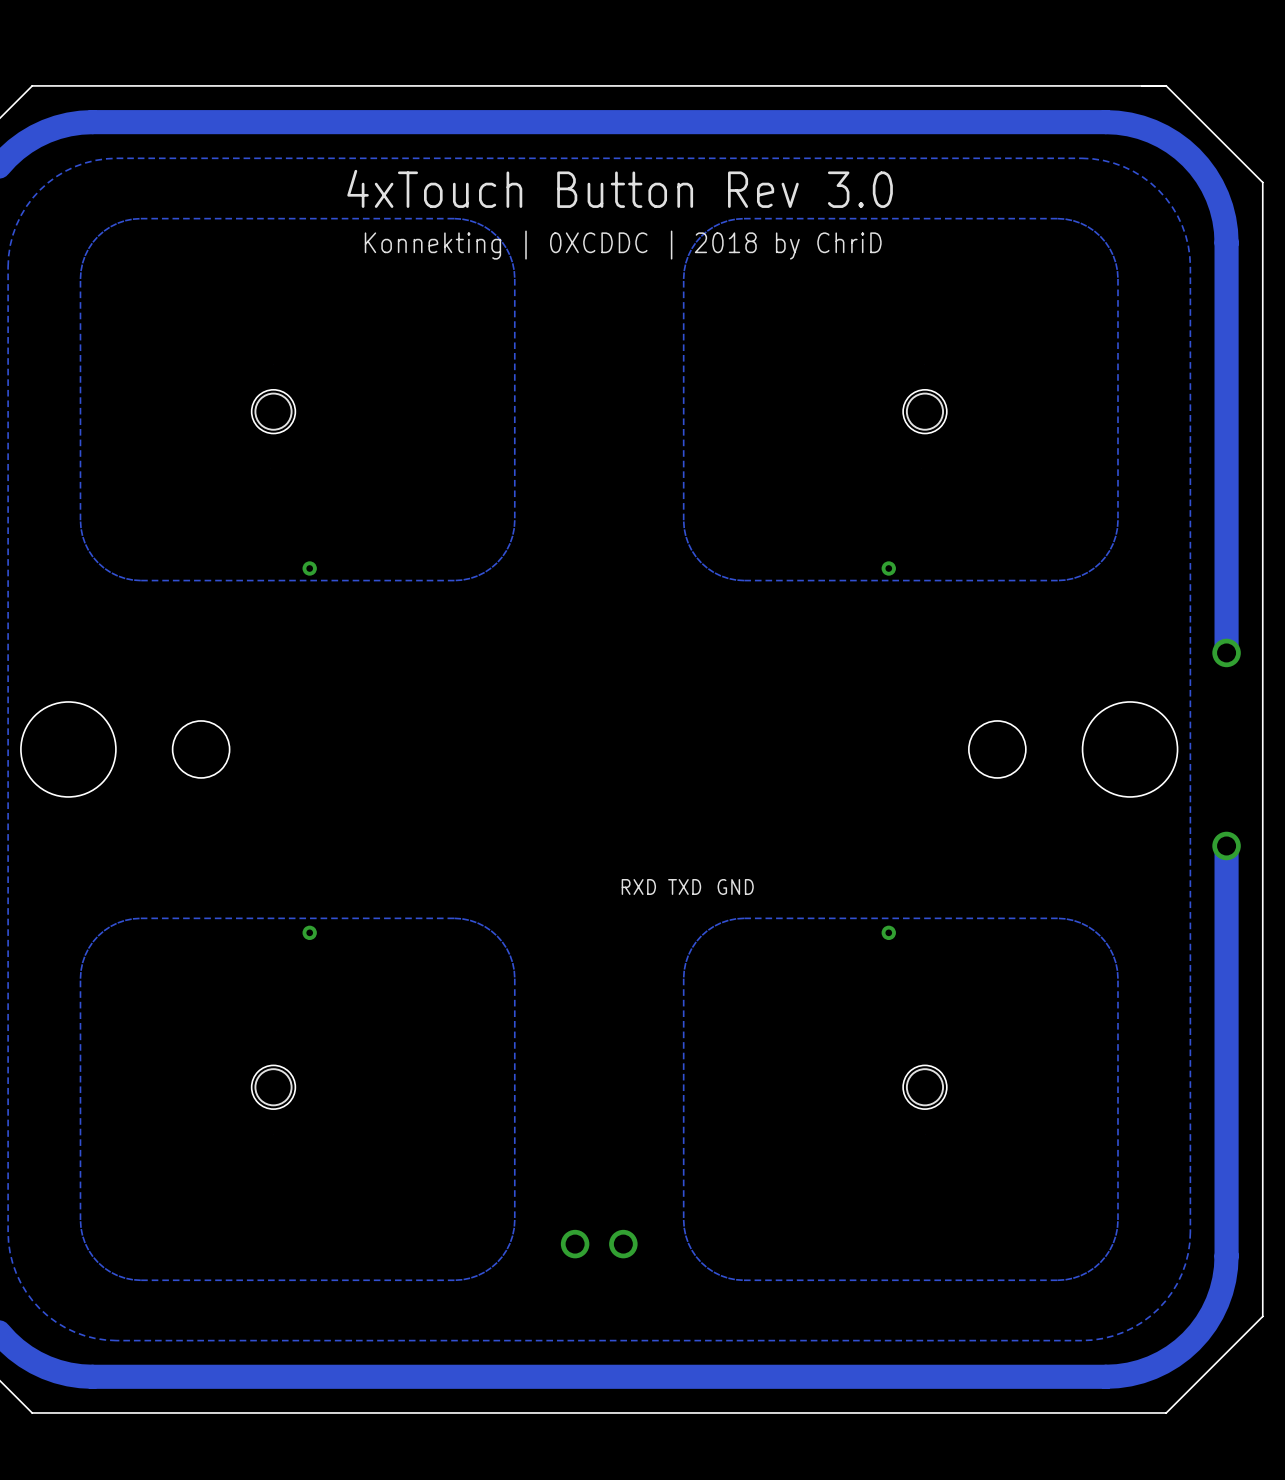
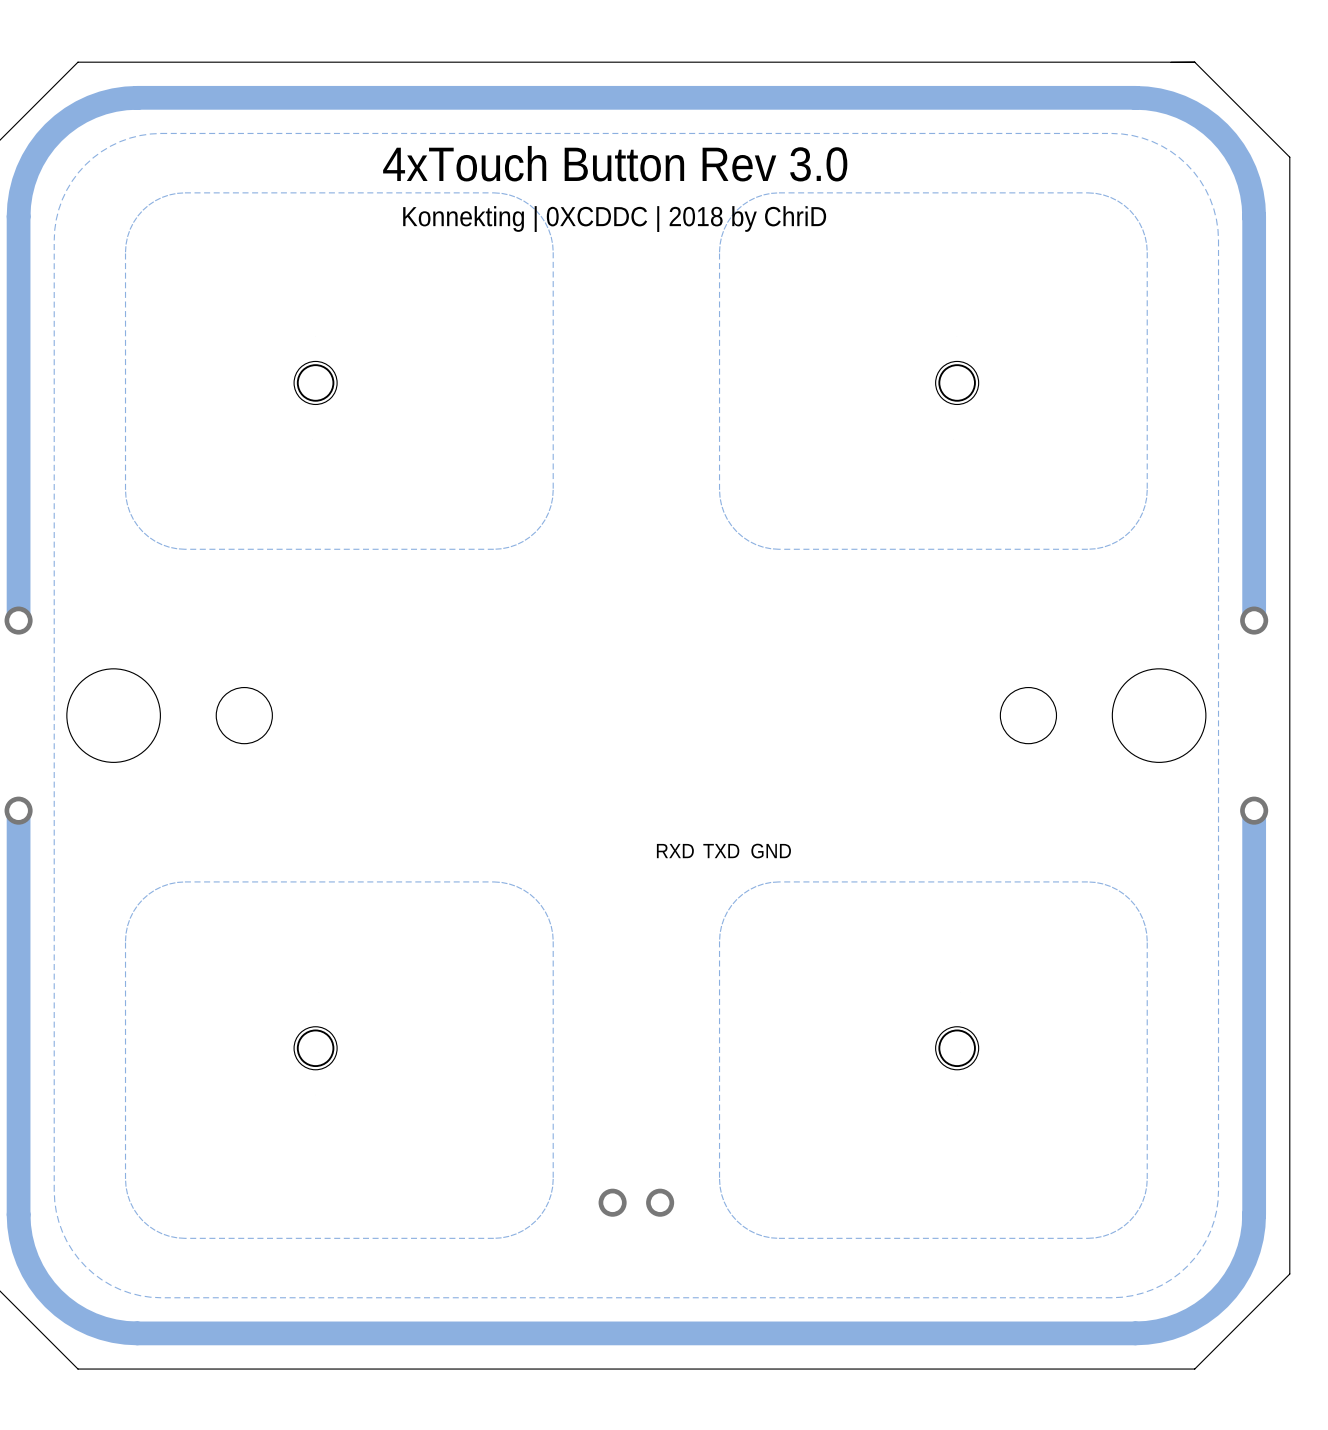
via: (309, 568) -> none
via: (888, 568) -> none
via: (309, 932) -> none
via: (888, 932) -> none

